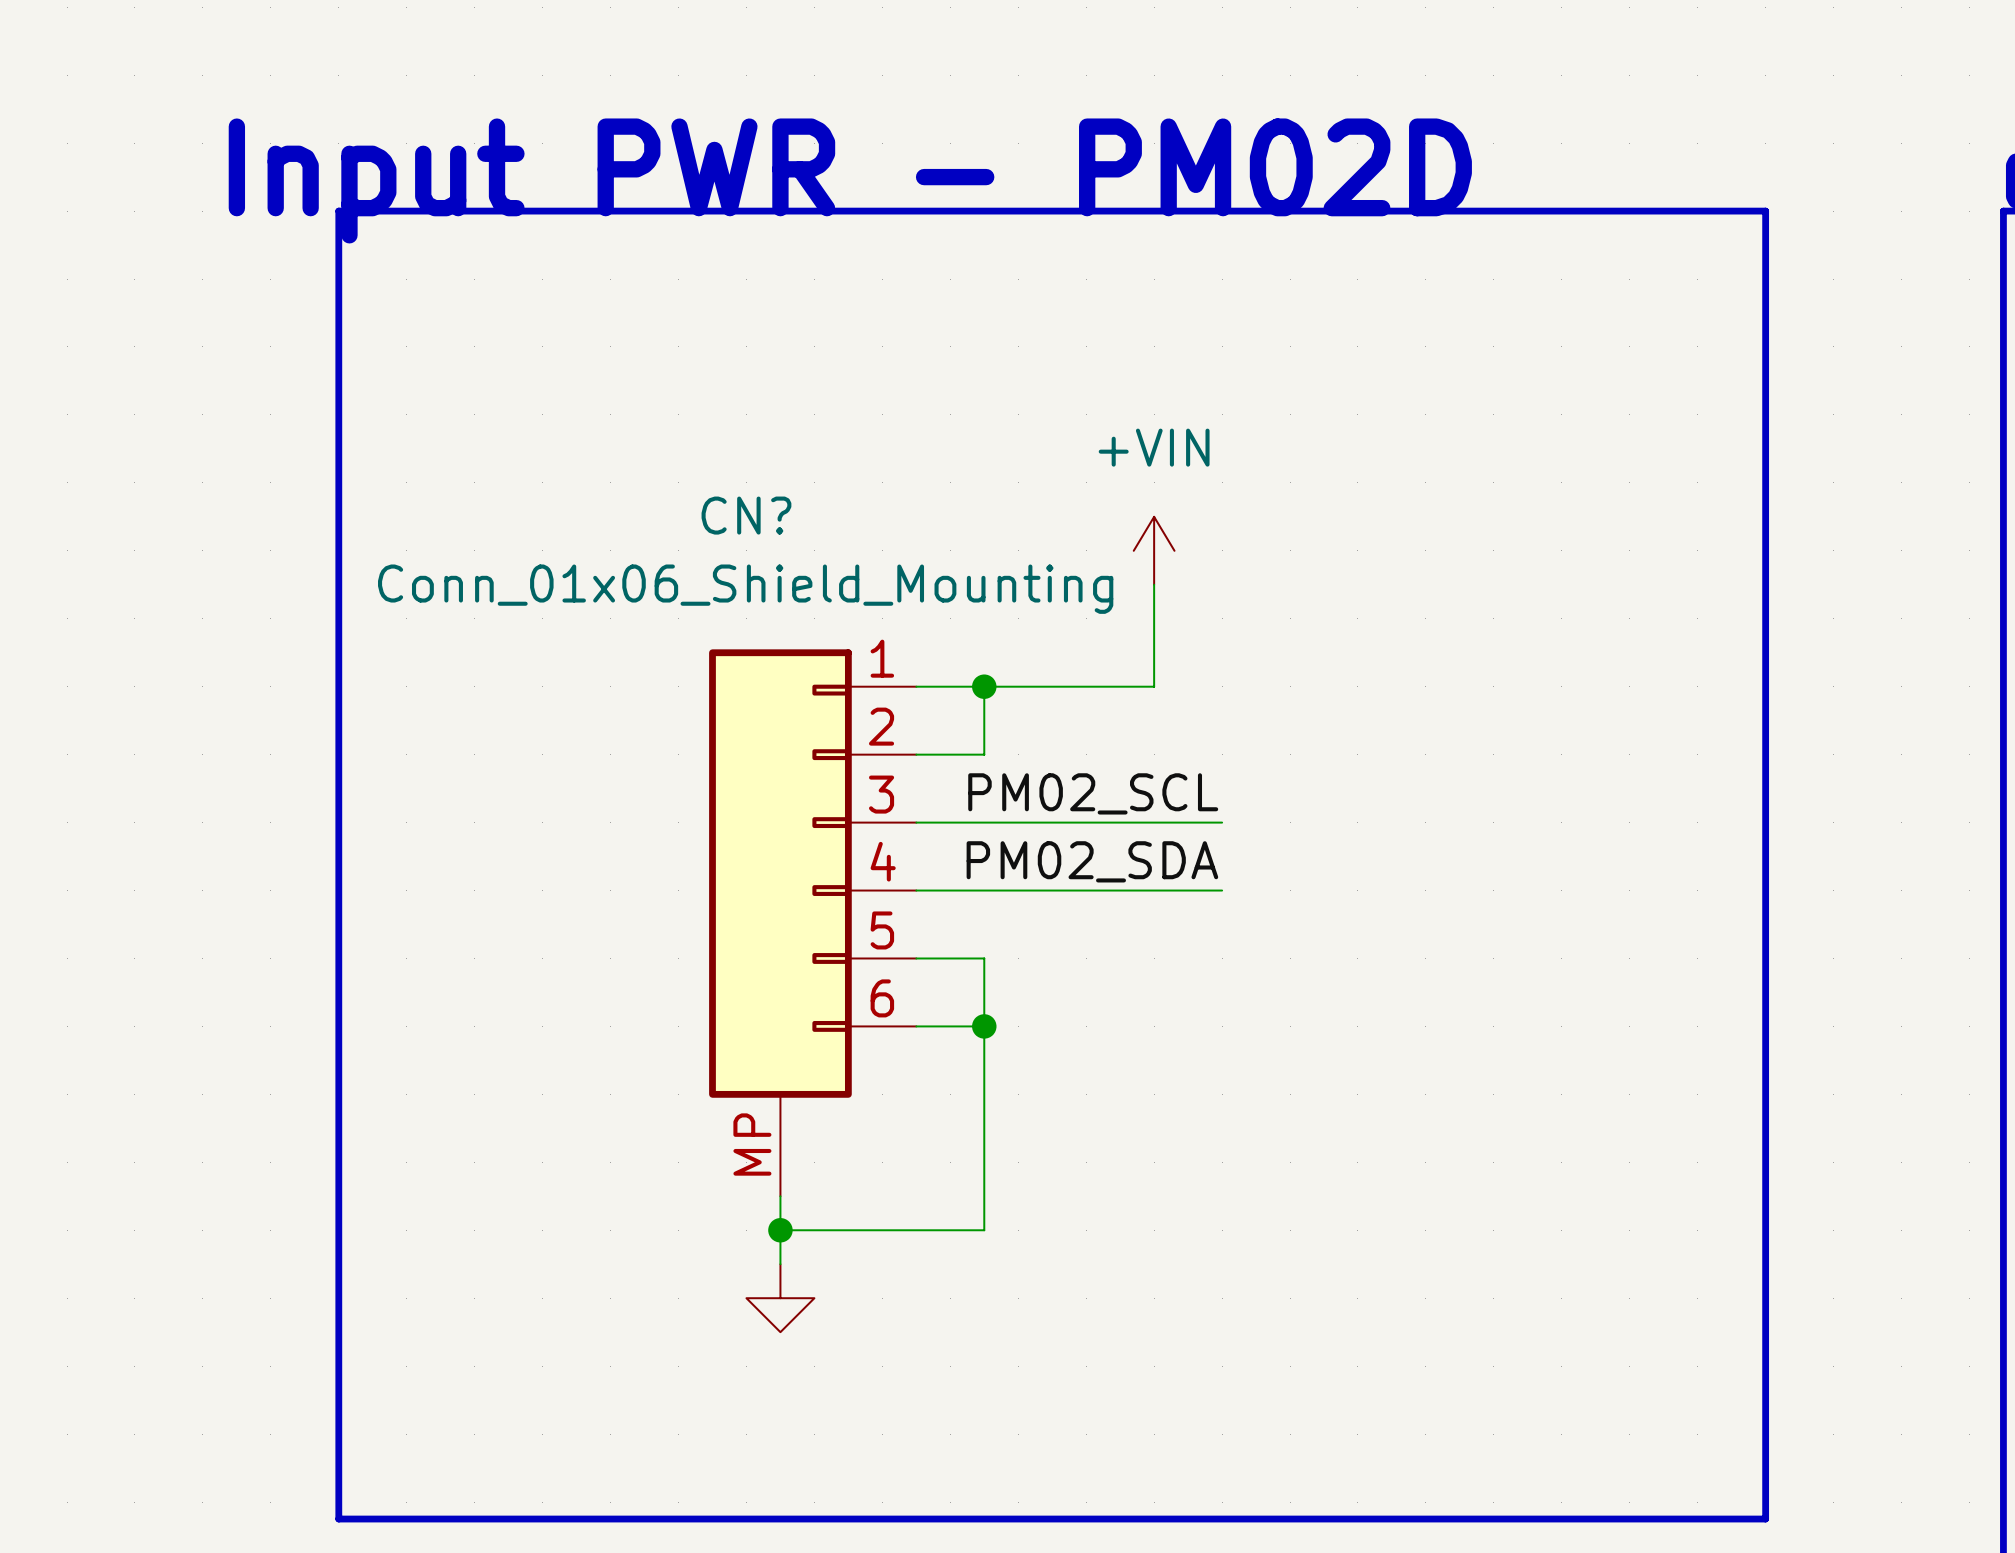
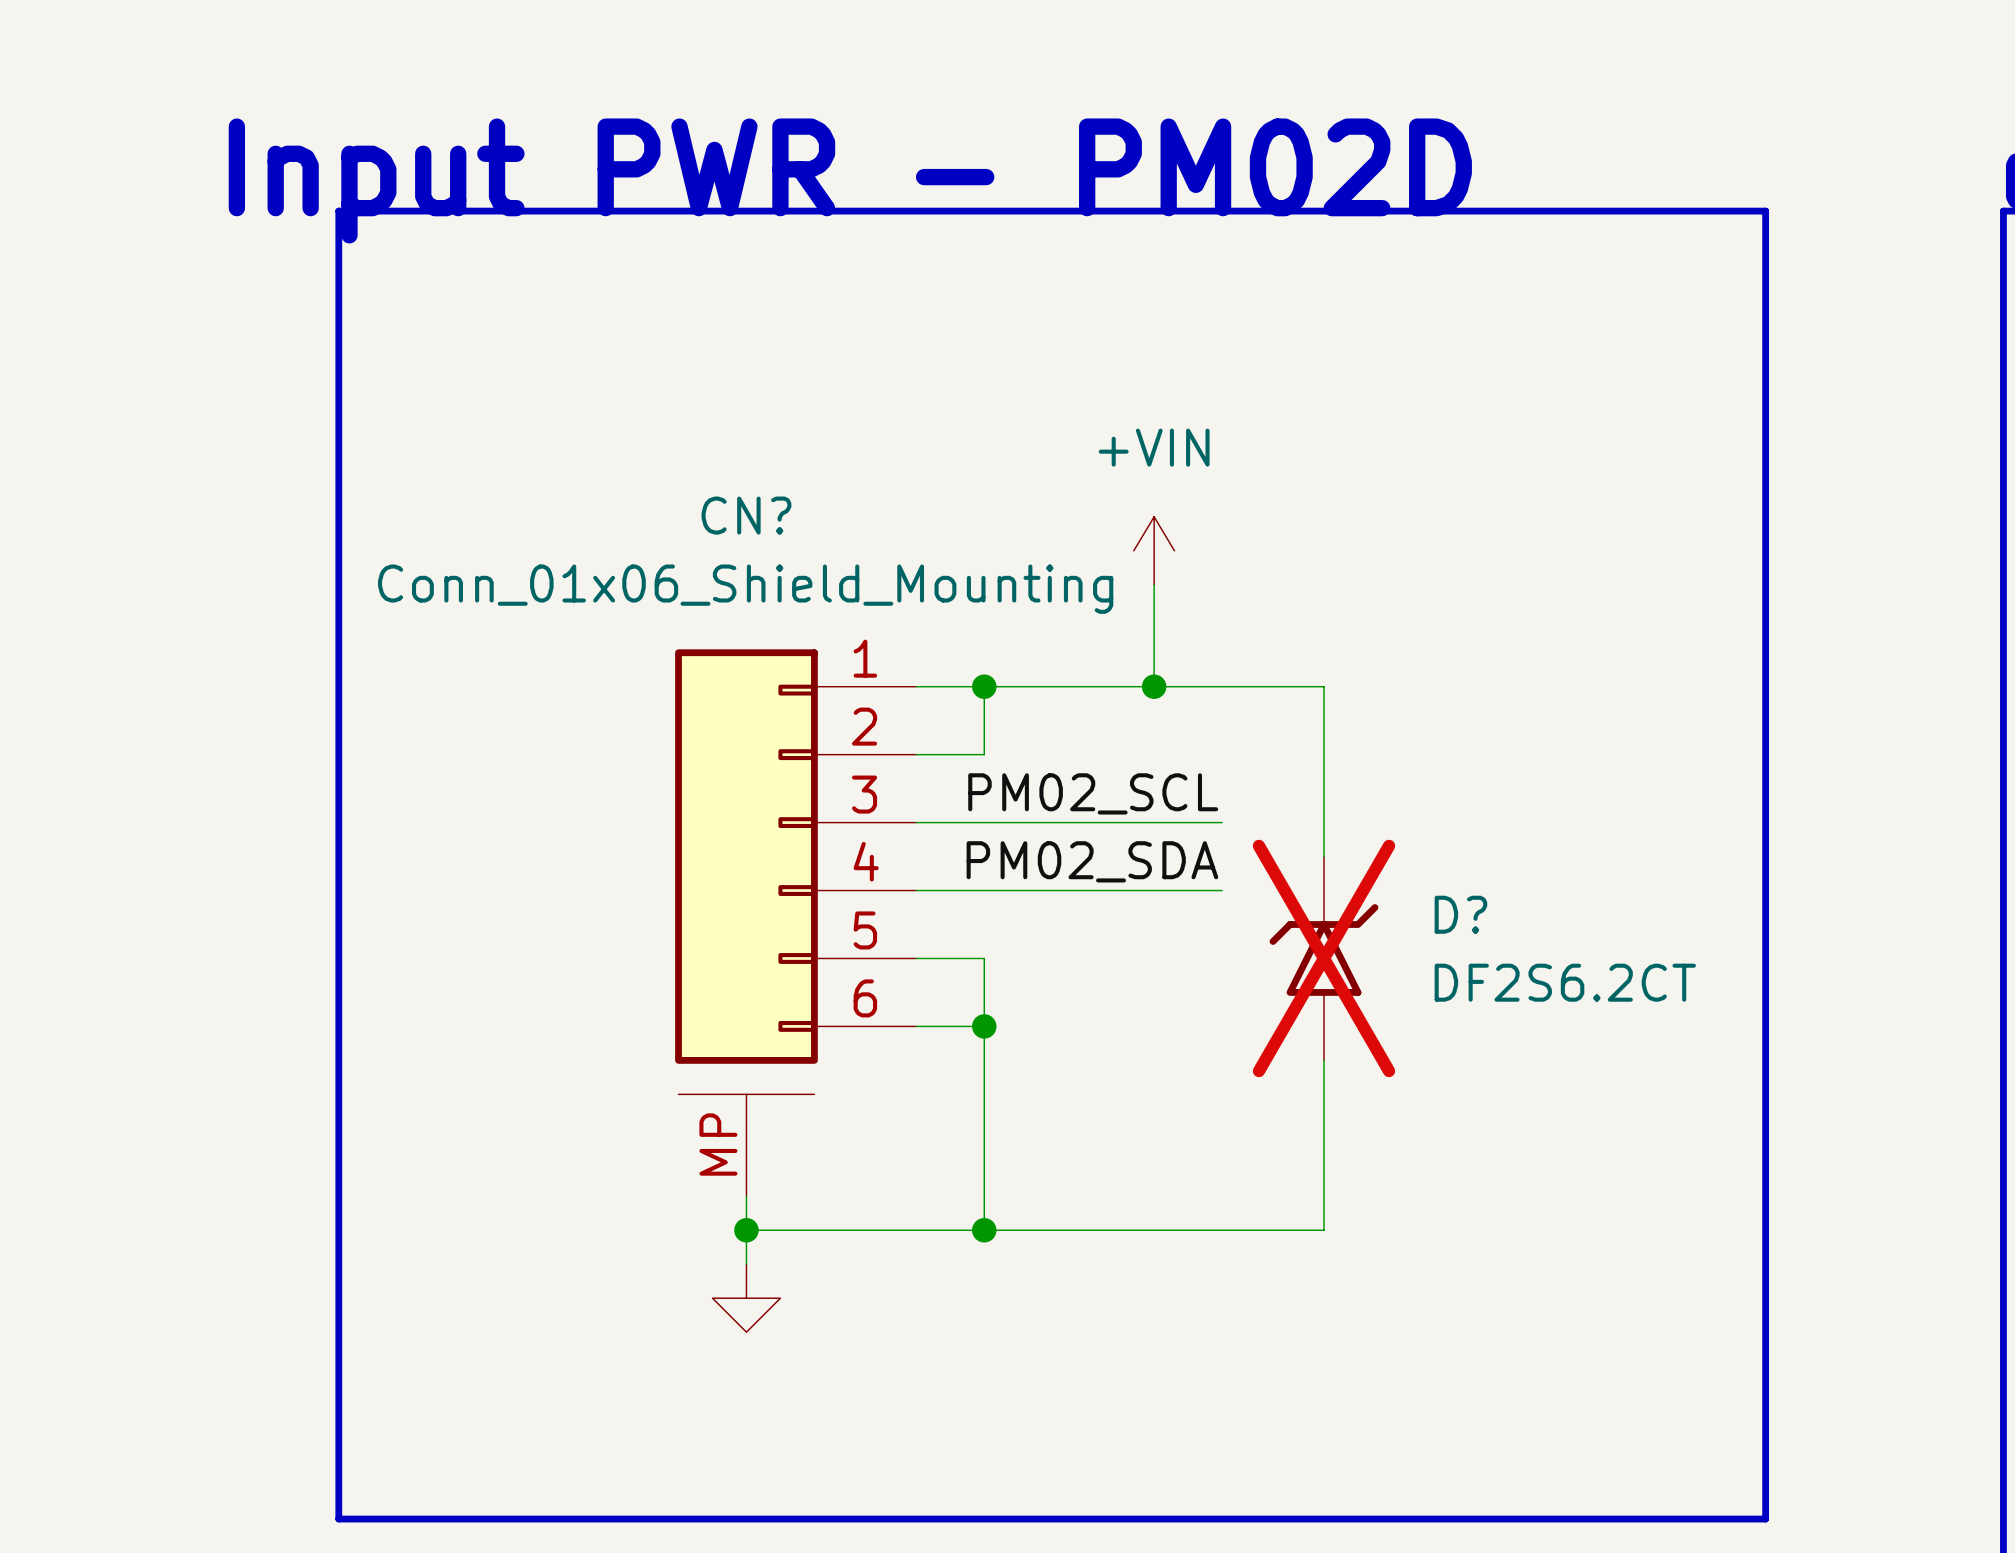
CN? symbol: [709, 649, 917, 1197] -> [675, 649, 917, 1197]
wire: none -> (1154, 686) (1323, 686) (1323, 856)
junction: none -> (1154, 686)
D?: none -> DF2S6.2CT (1323, 958)
wire: none -> (1323, 1060) (1323, 1230) (984, 1230)
wire: (780, 1196) (780, 1264) -> (746, 1196) (746, 1264)
wire: none -> (746, 1230) (780, 1230)
junction position: (780, 1230) -> (746, 1230)
junction: none -> (984, 1230)
power symbol position: (780, 1298) -> (746, 1298)

